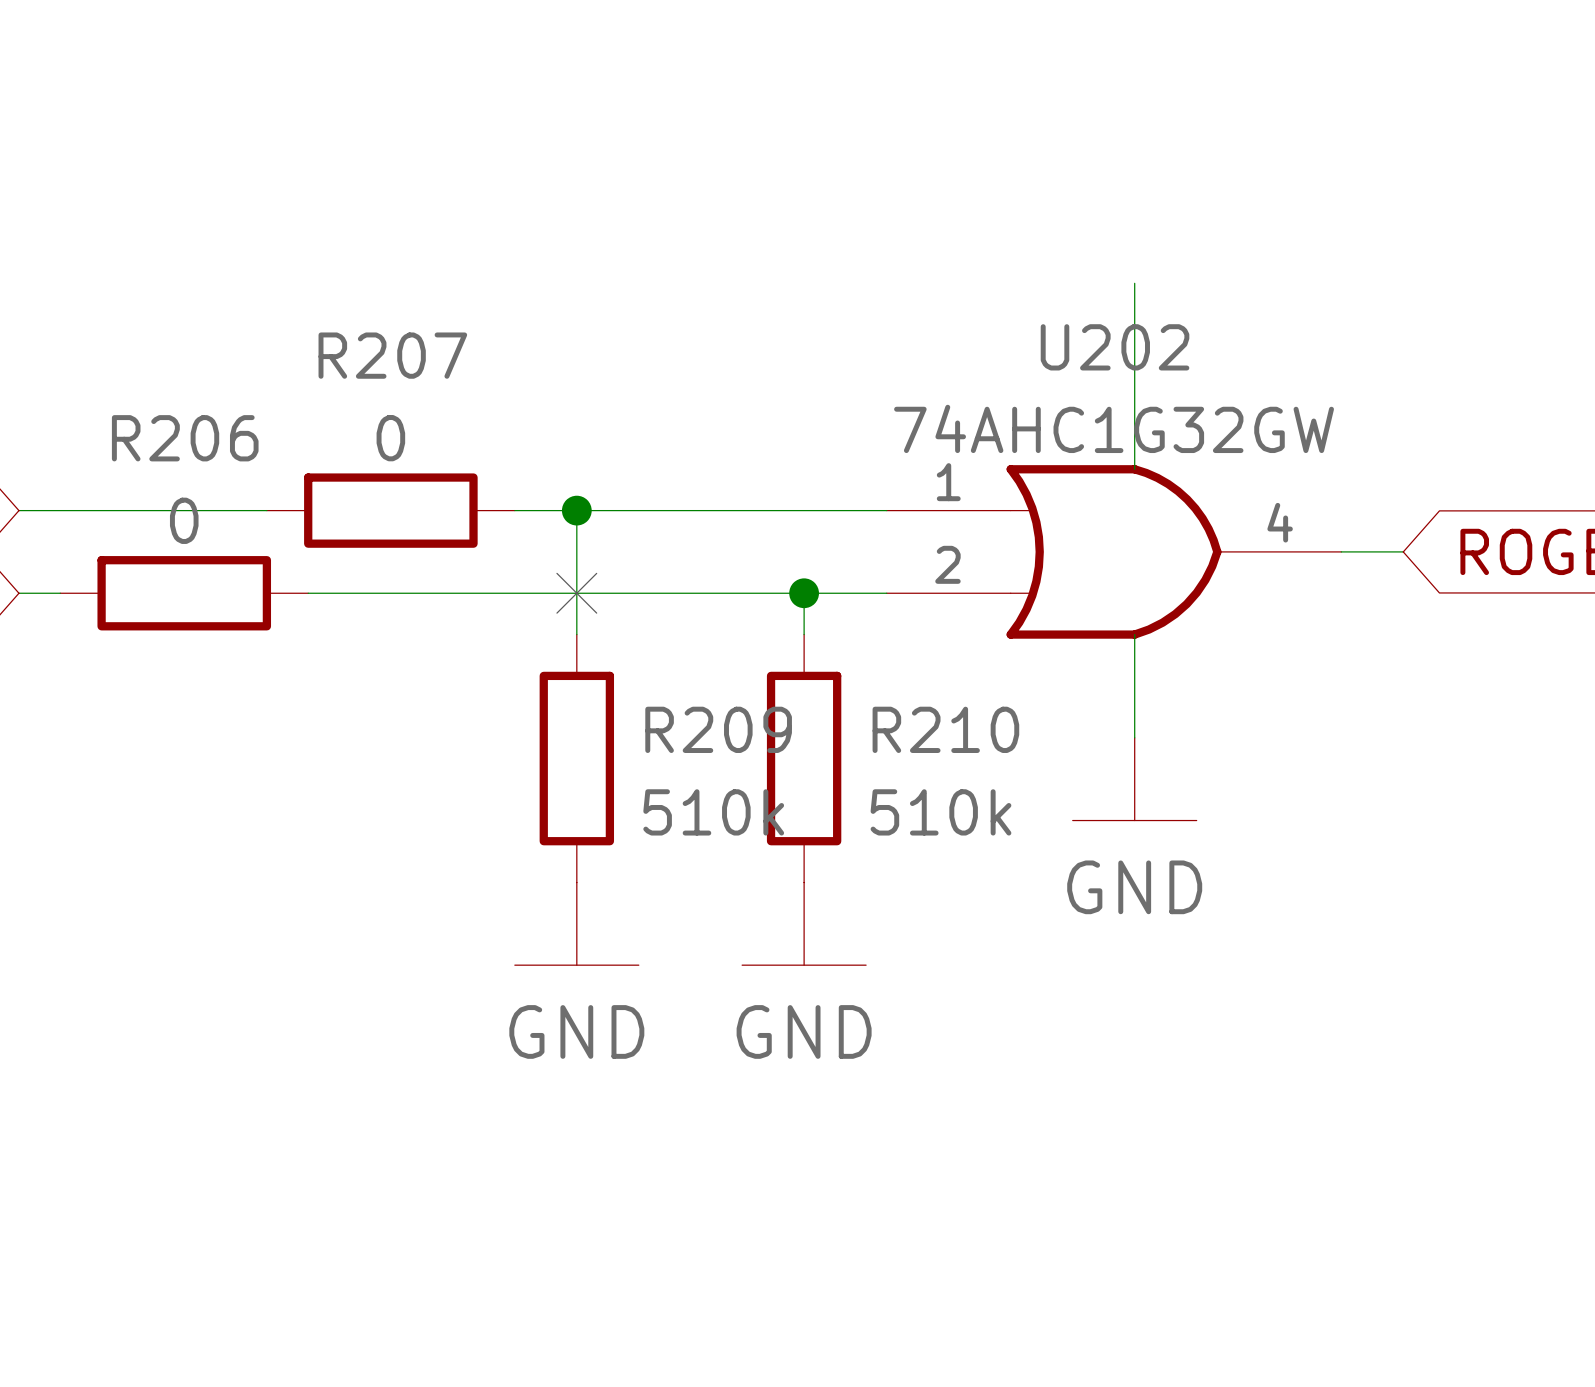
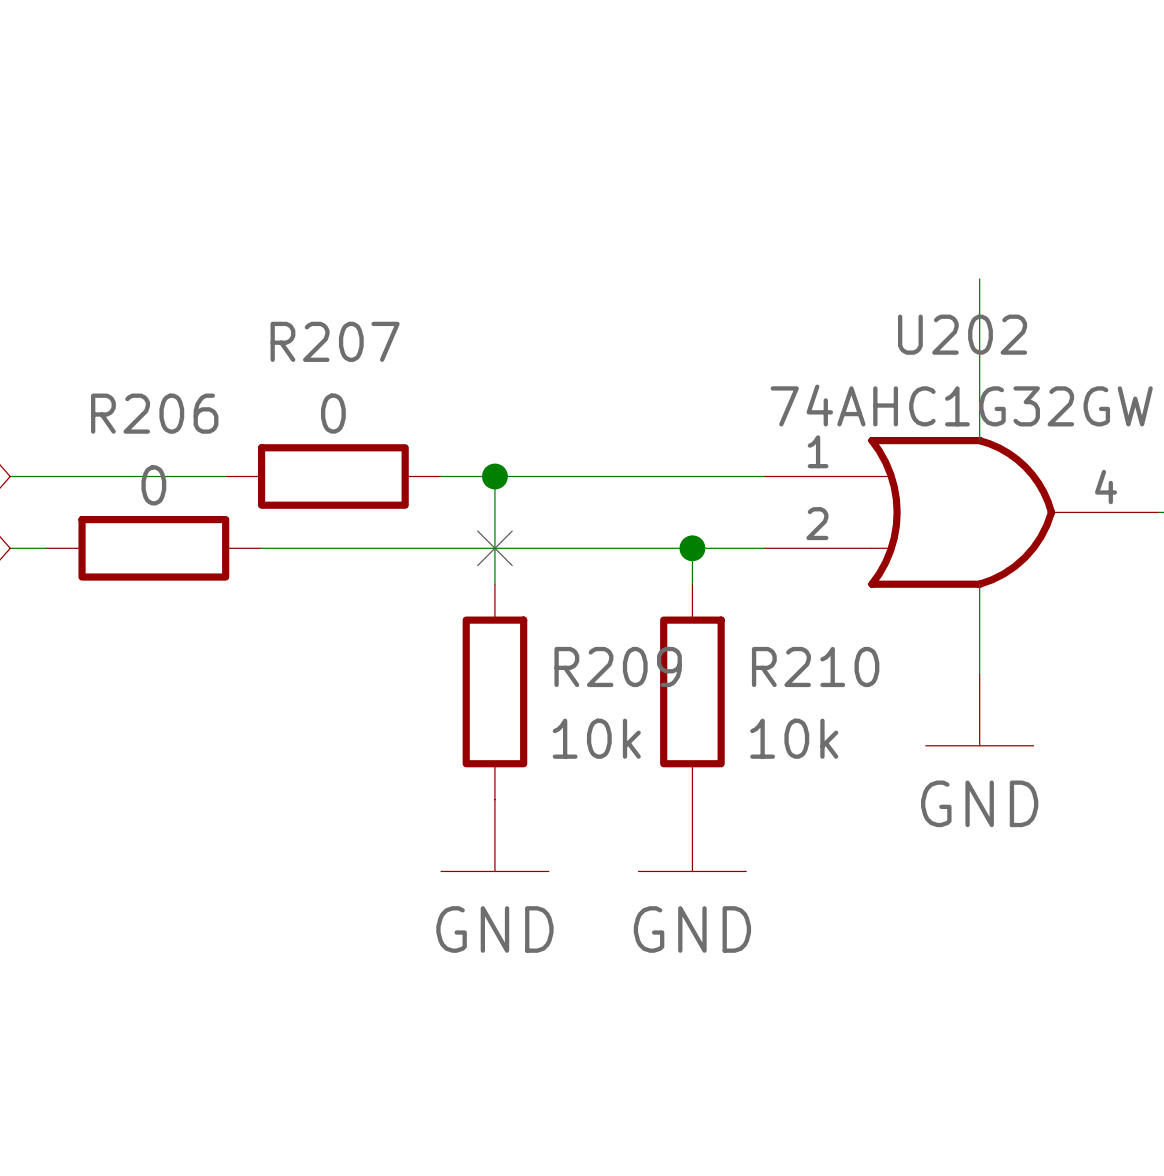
R209 value: 510k (713, 812) -> 10k (596, 738)
R210 value: 510k (940, 812) -> 10k (794, 738)

